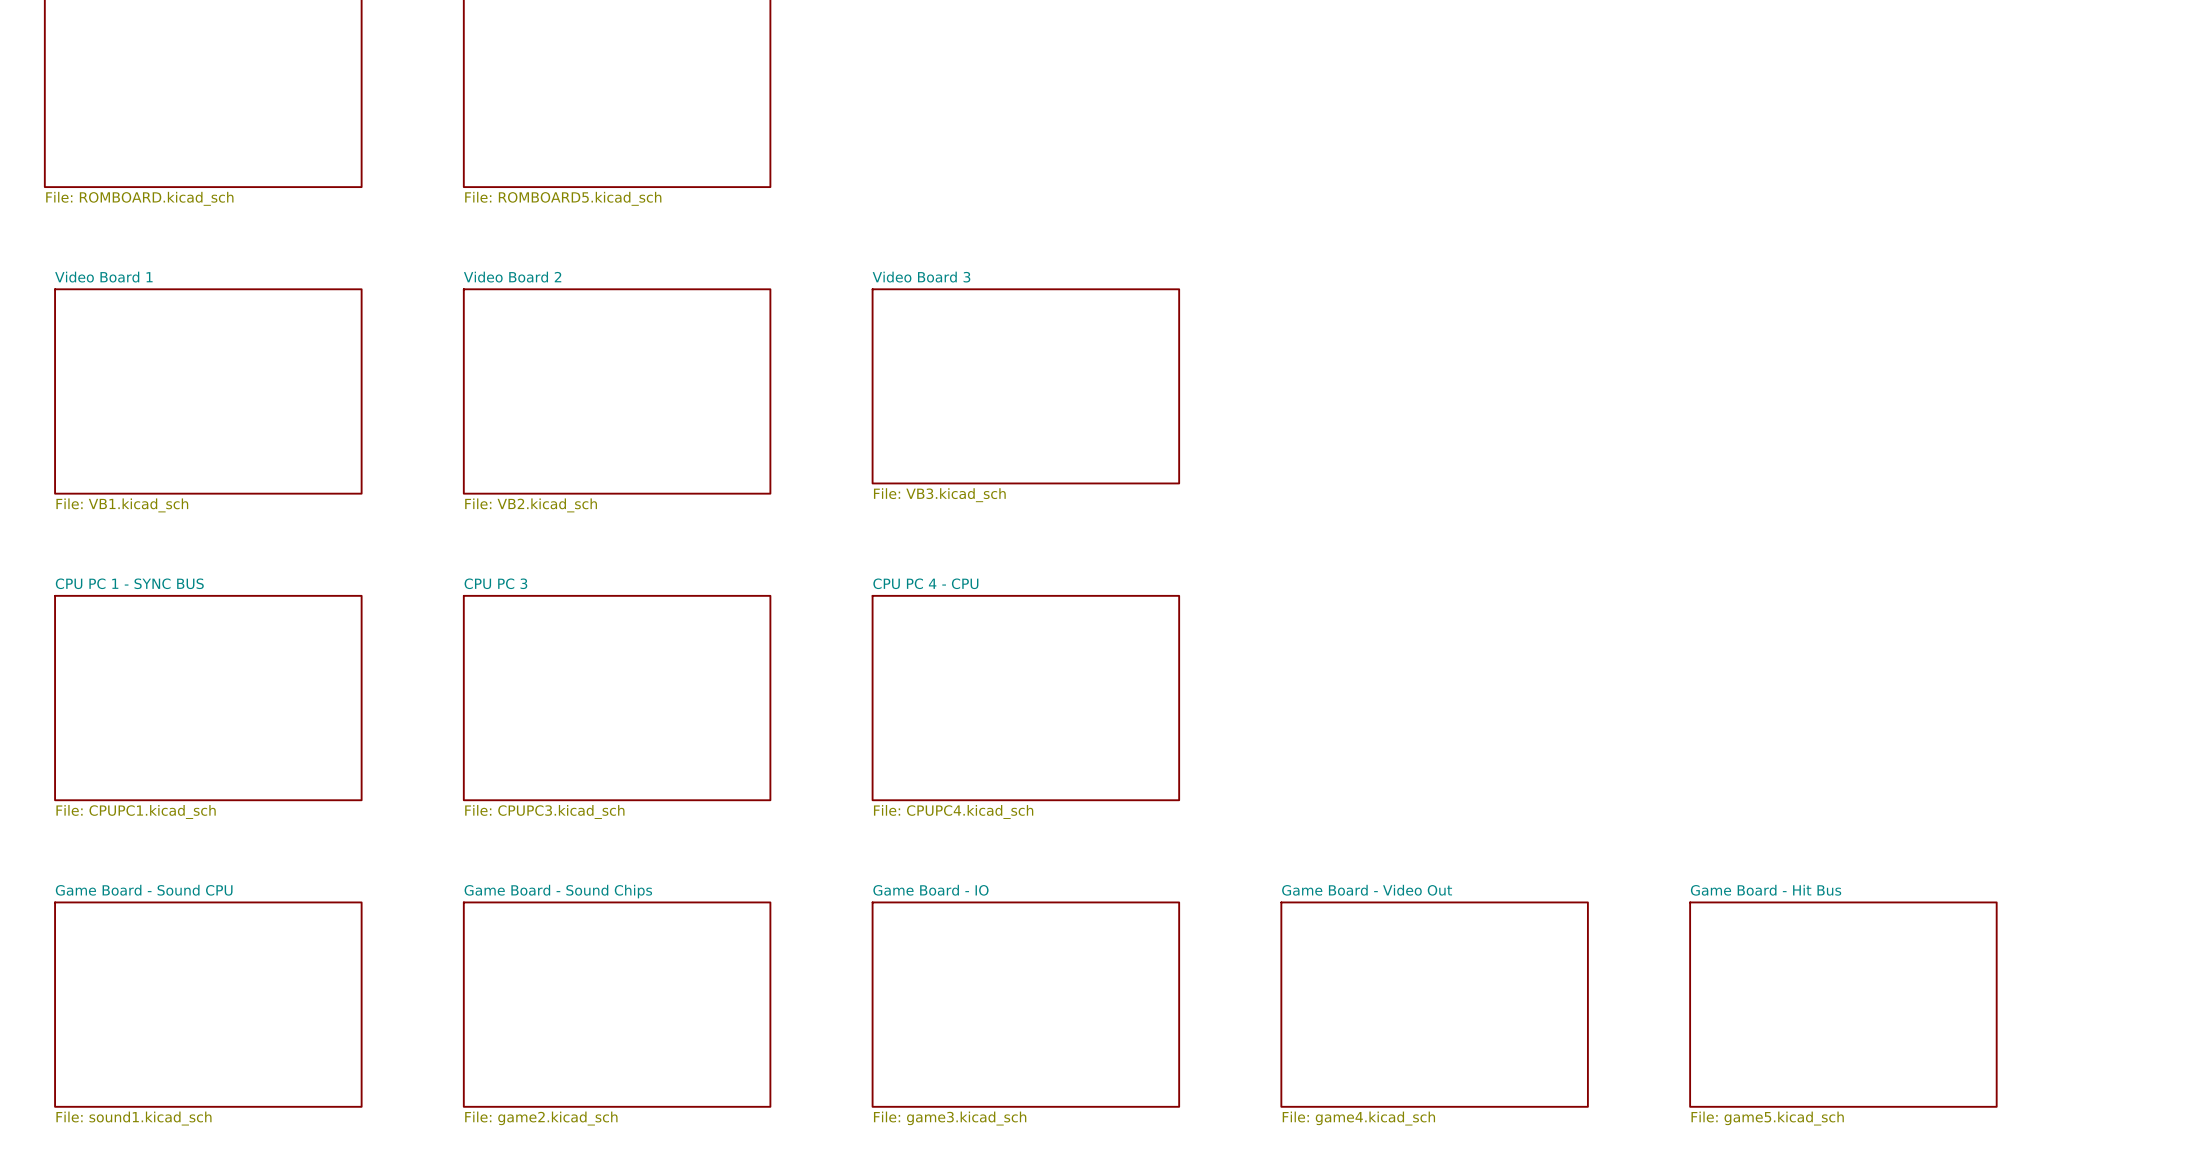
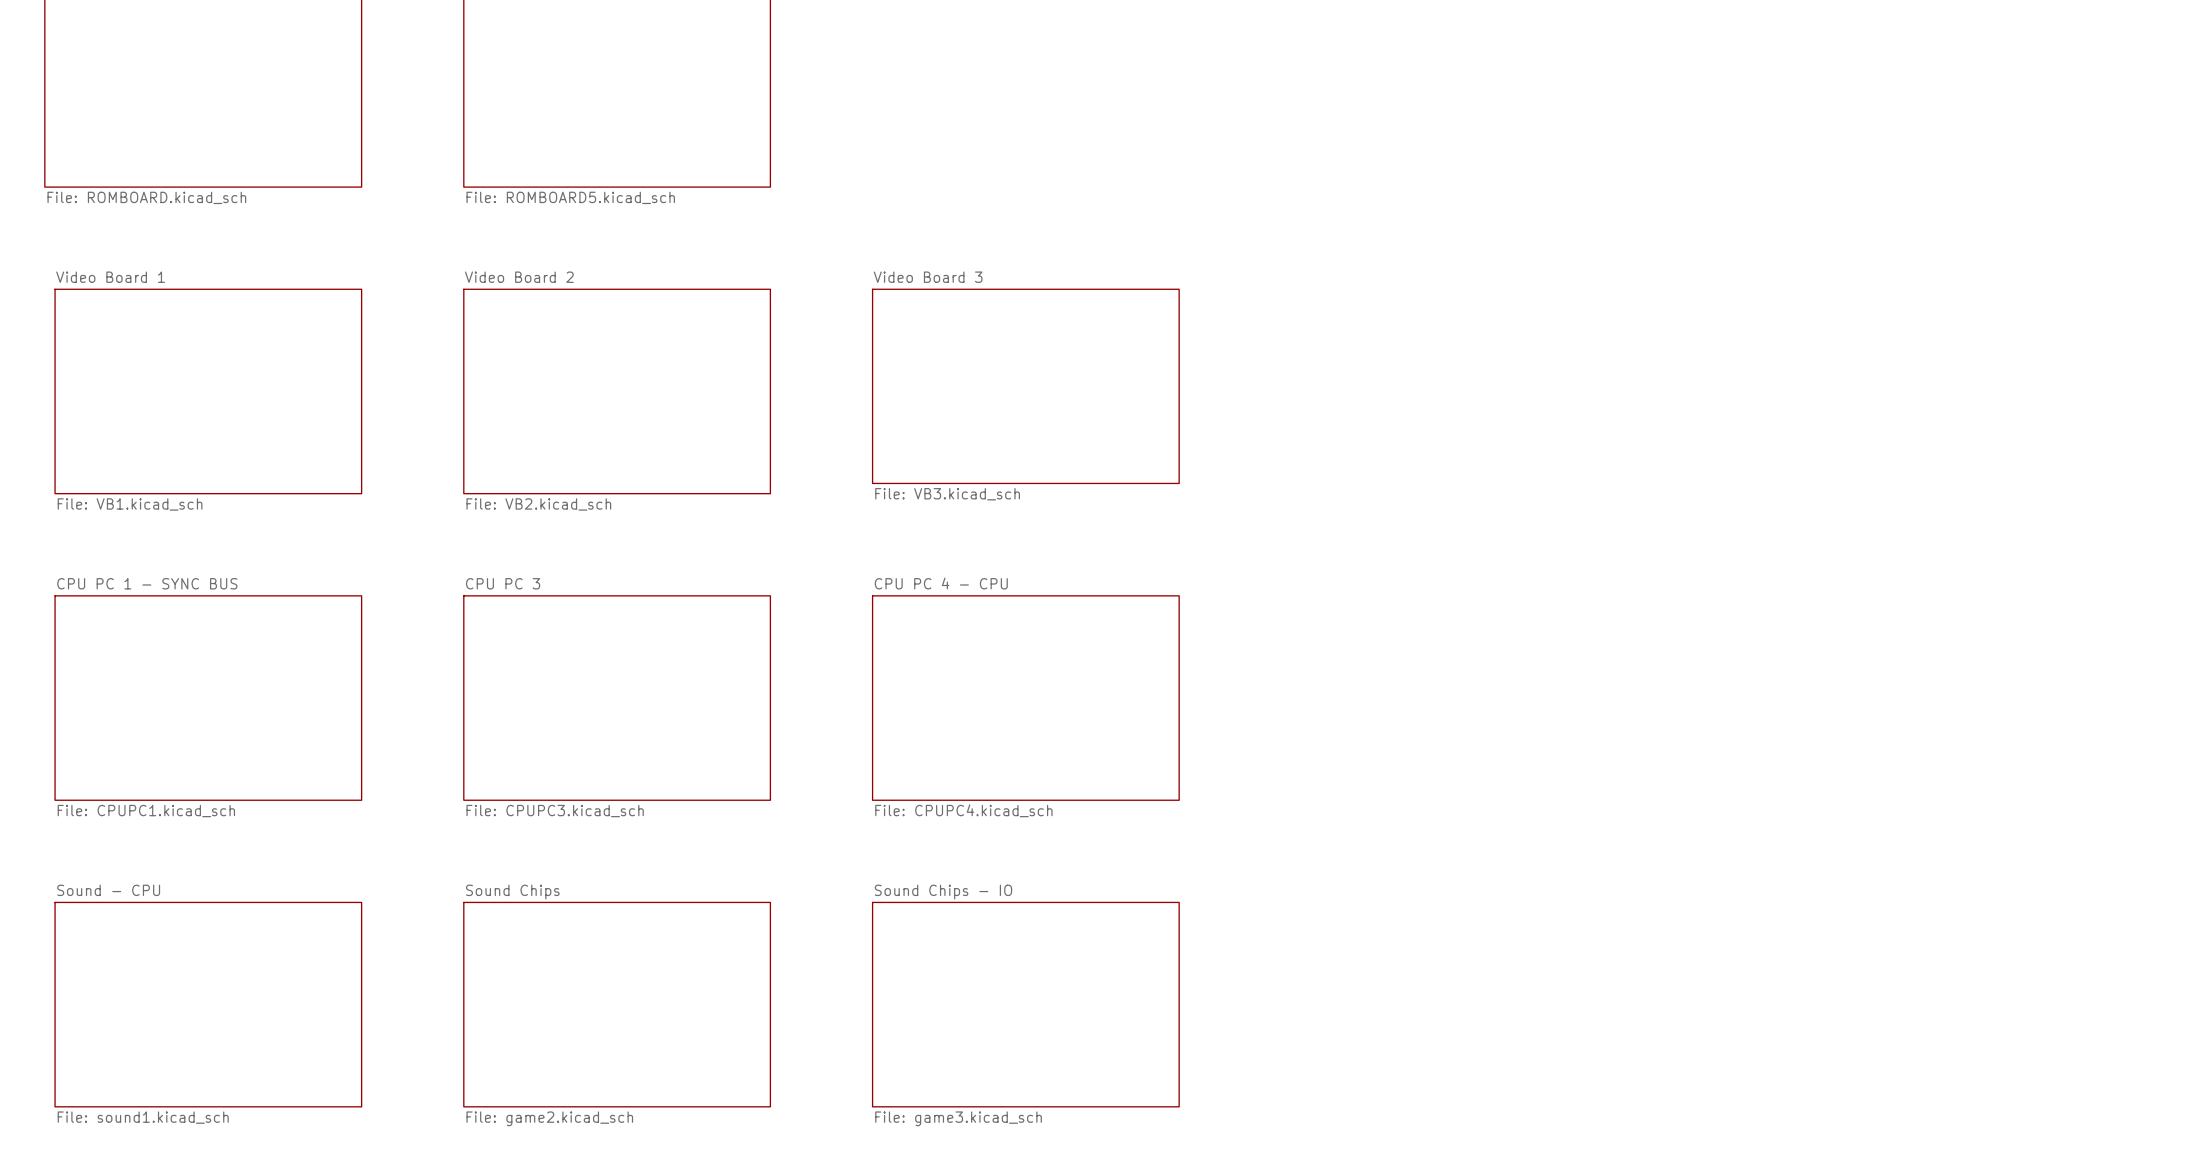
sheet Game Board - Sound CPU name: Game Board - Sound CPU (144, 890) -> Sound - CPU (108, 890)
sheet Game Board - IO name: Game Board - IO (930, 890) -> Sound Chips - IO (943, 892)
sheet Game Board - Sound Chips name: Game Board - Sound Chips (558, 891) -> Sound Chips (512, 892)
sheet Game Board - Video Out: File: game4.kicad_sch (1434, 1004) -> none
sheet Game Board - Hit Bus: File: game5.kicad_sch (1843, 1004) -> none

